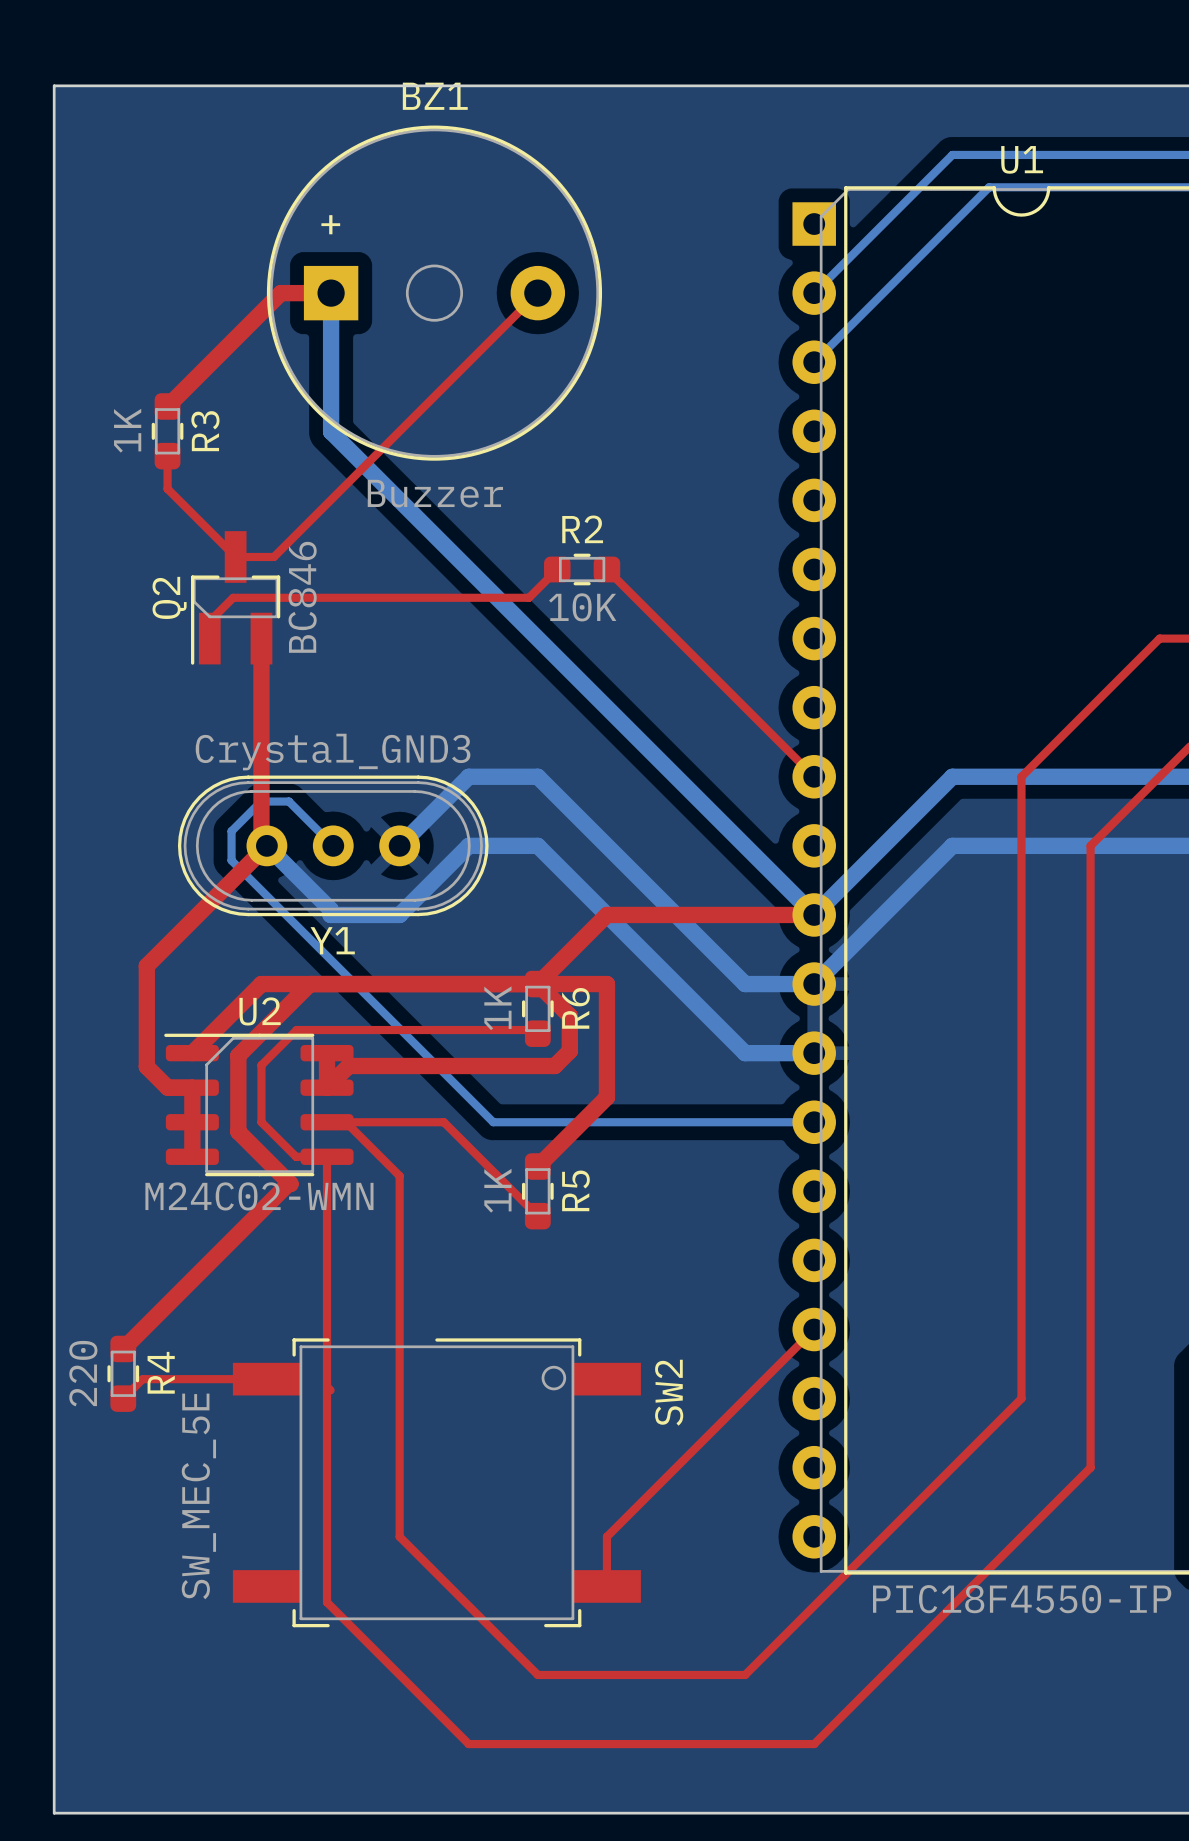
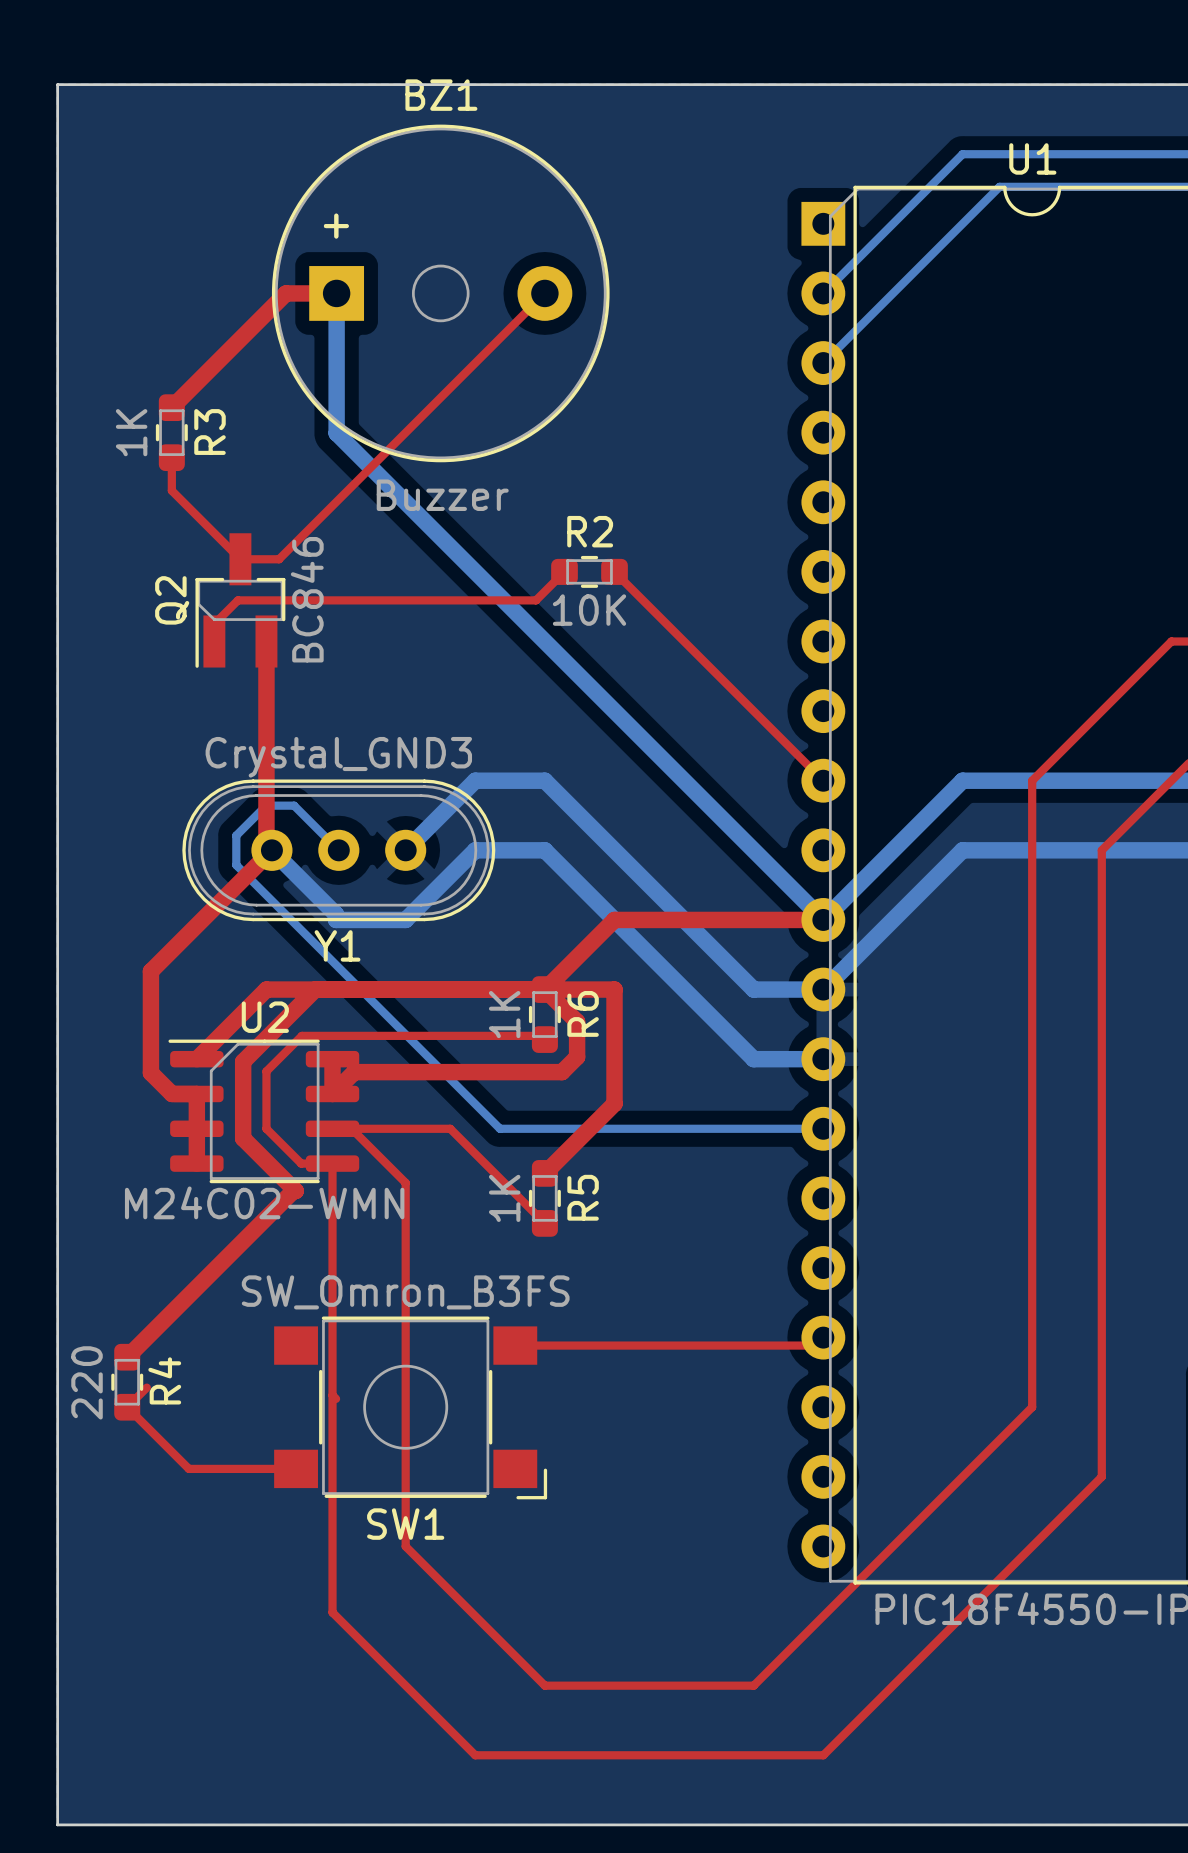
top track: (806, 1337) (606, 1536) (606, 1586) -> (815, 1345) (515, 1345)
top track: (142, 1379) (266, 1379) -> none
top track: none -> (127, 1407) (188, 1468) (296, 1468)
SW1: none -> SW_Omron_B3FS (410, 1407)
SW2: SW_MEC_5E (436, 1482) -> none

